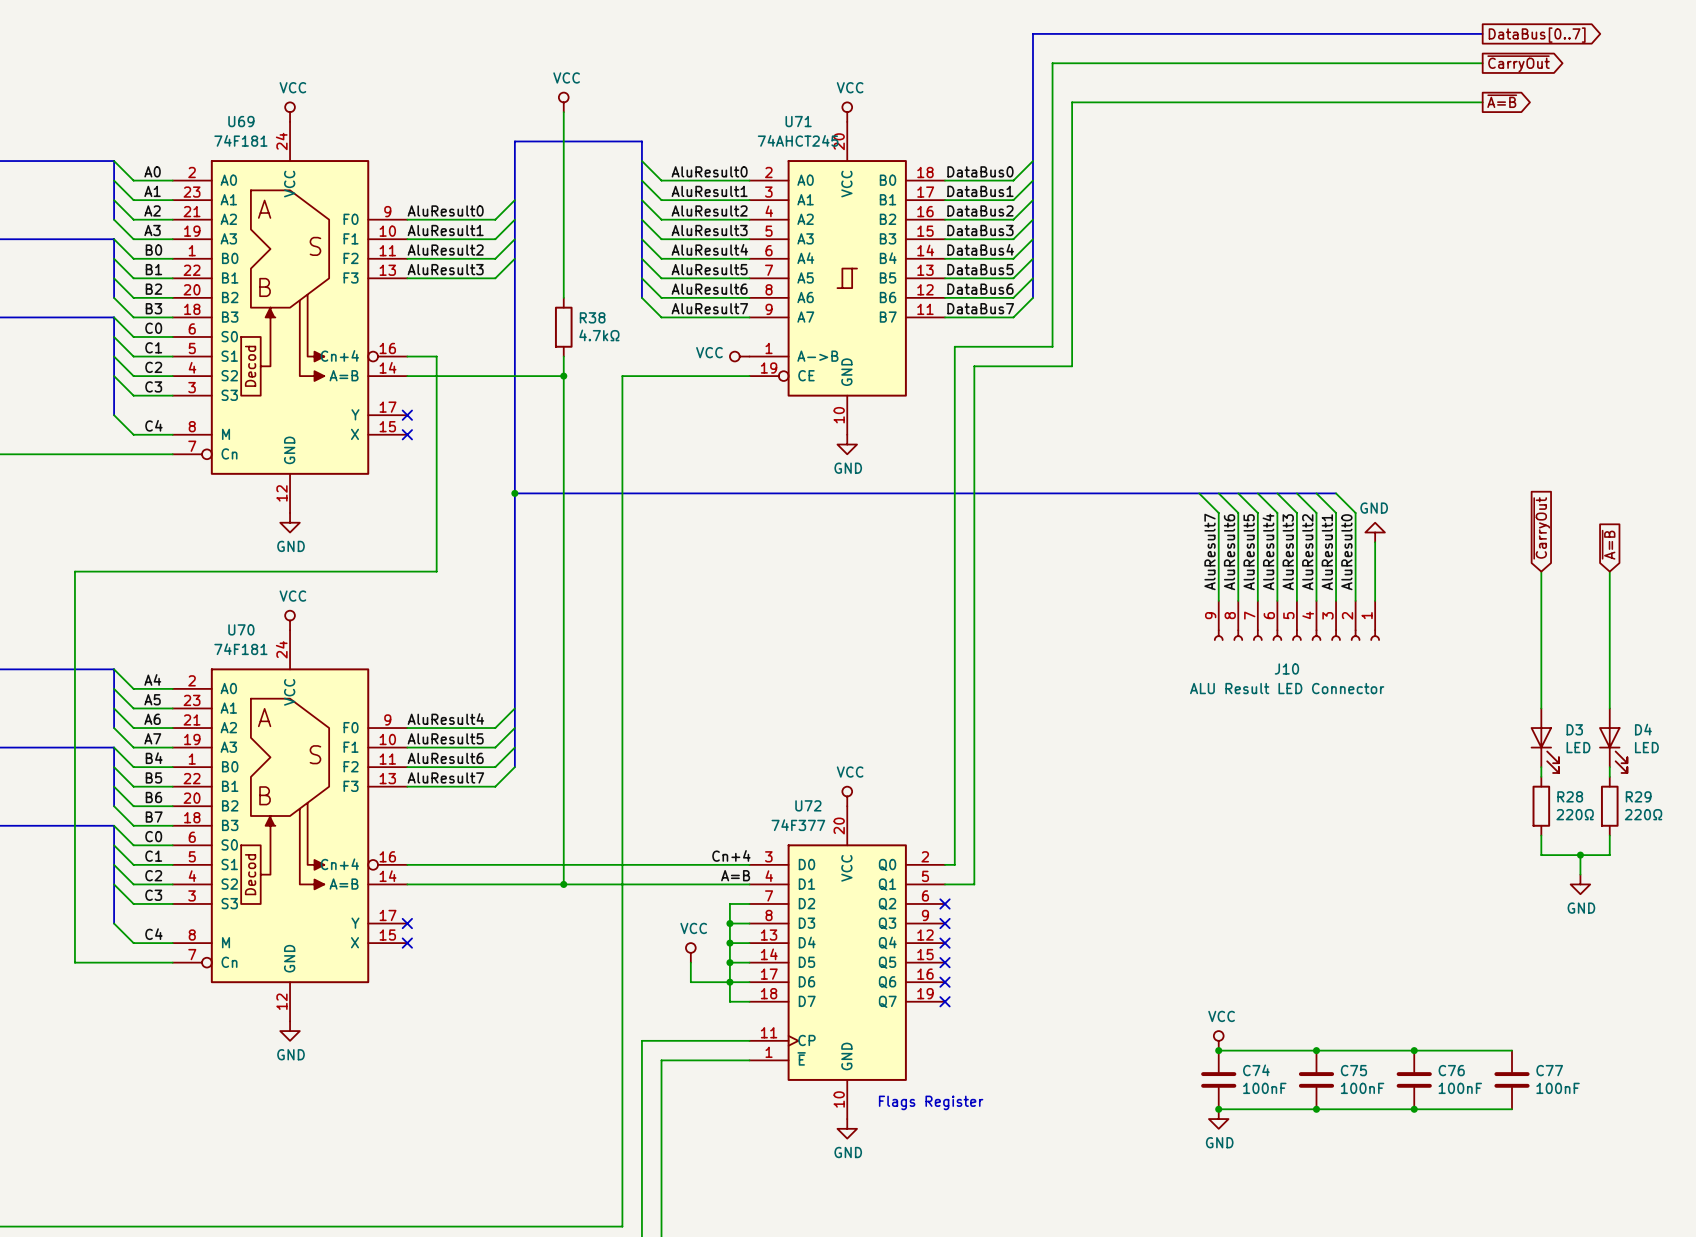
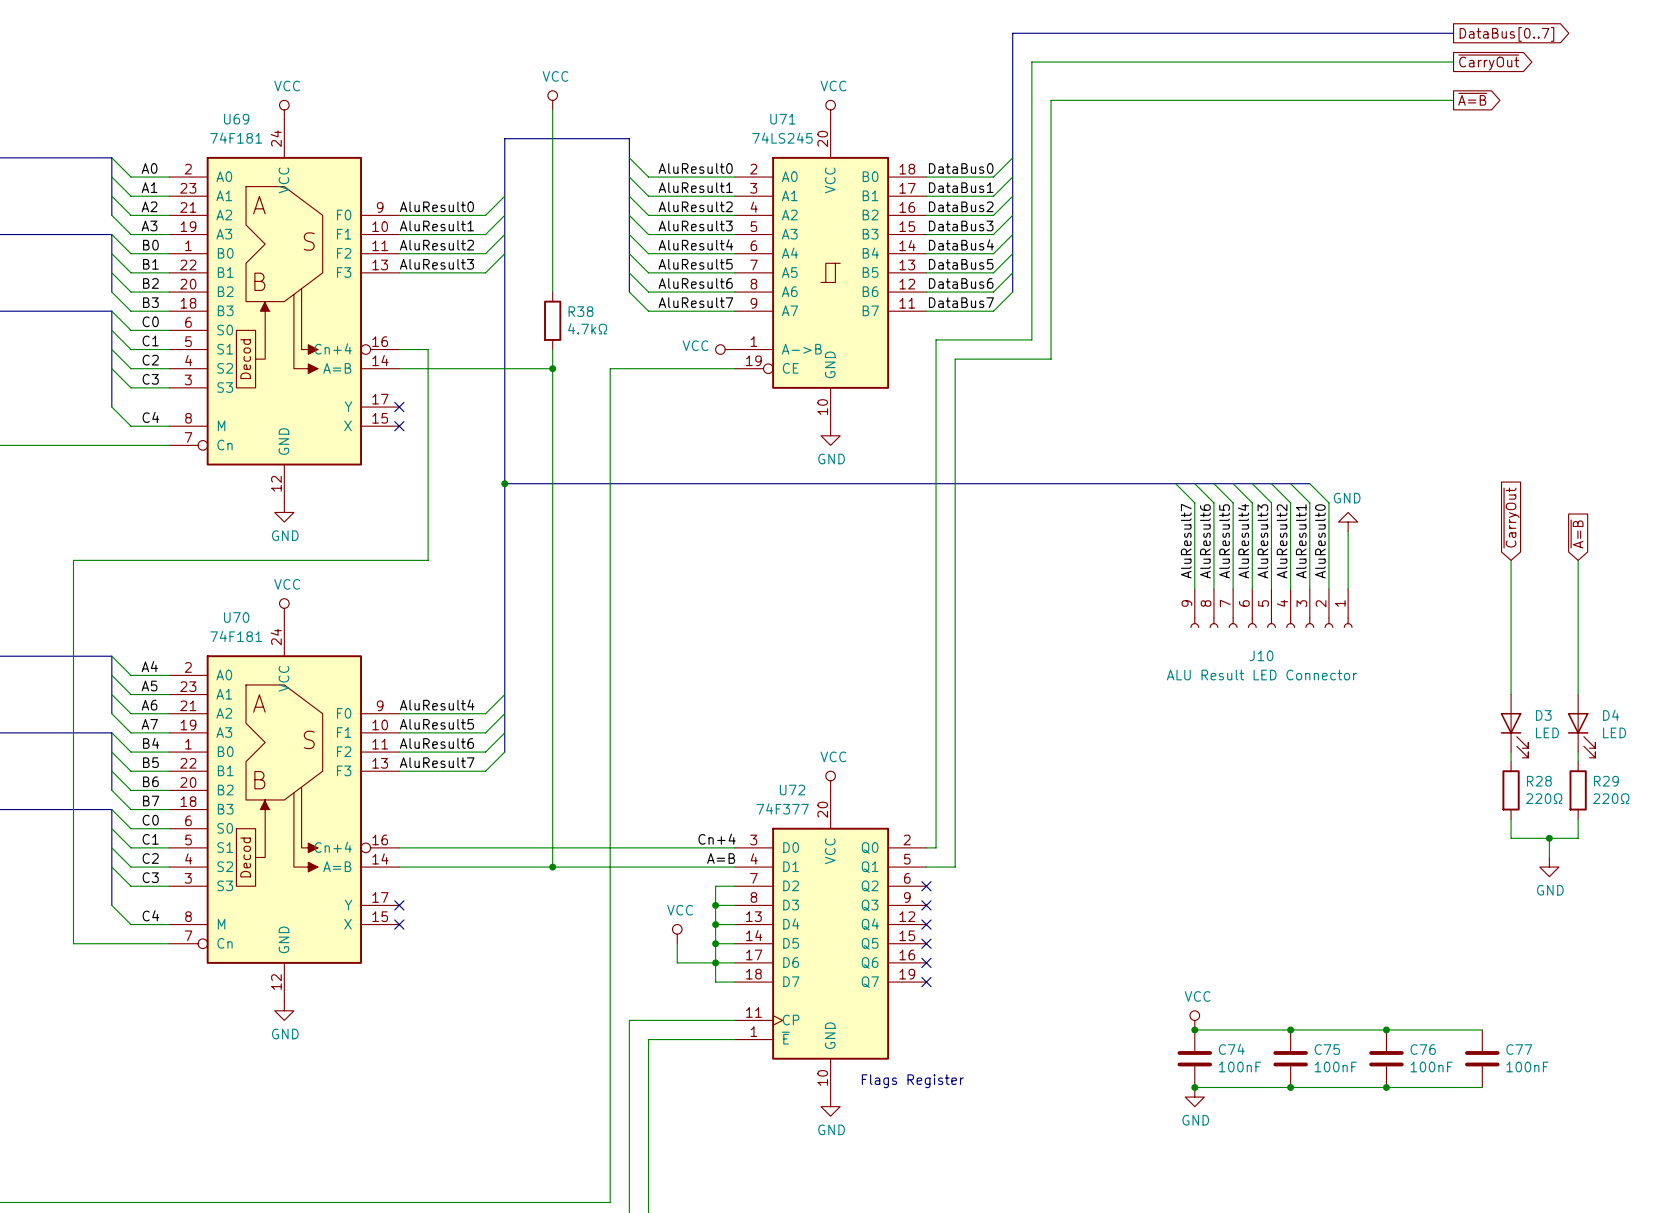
U71 value: 74AHCT245 (798, 140) -> 74LS245 (782, 138)

